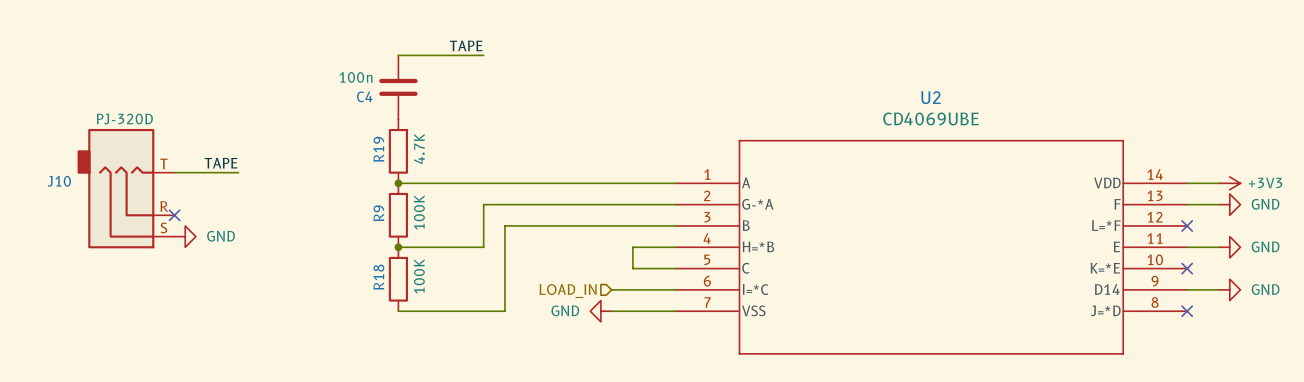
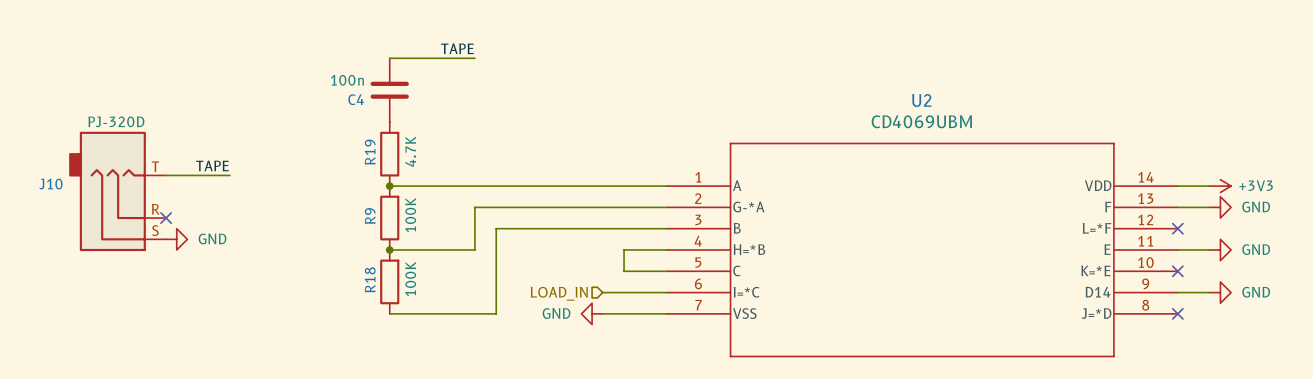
U2 value: CD4069UBE (931, 118) -> CD4069UBM (921, 121)

